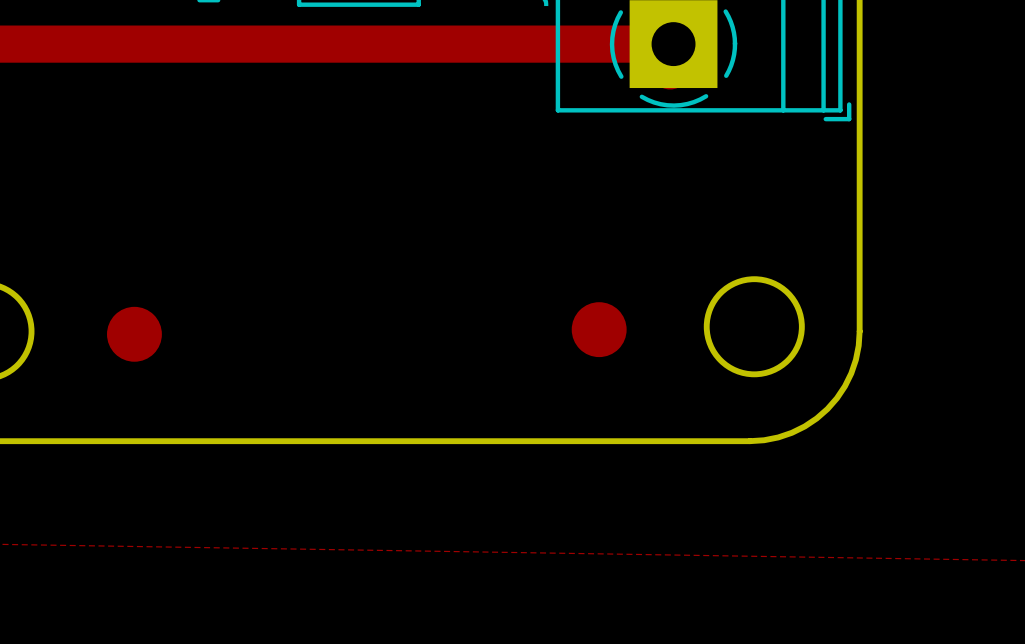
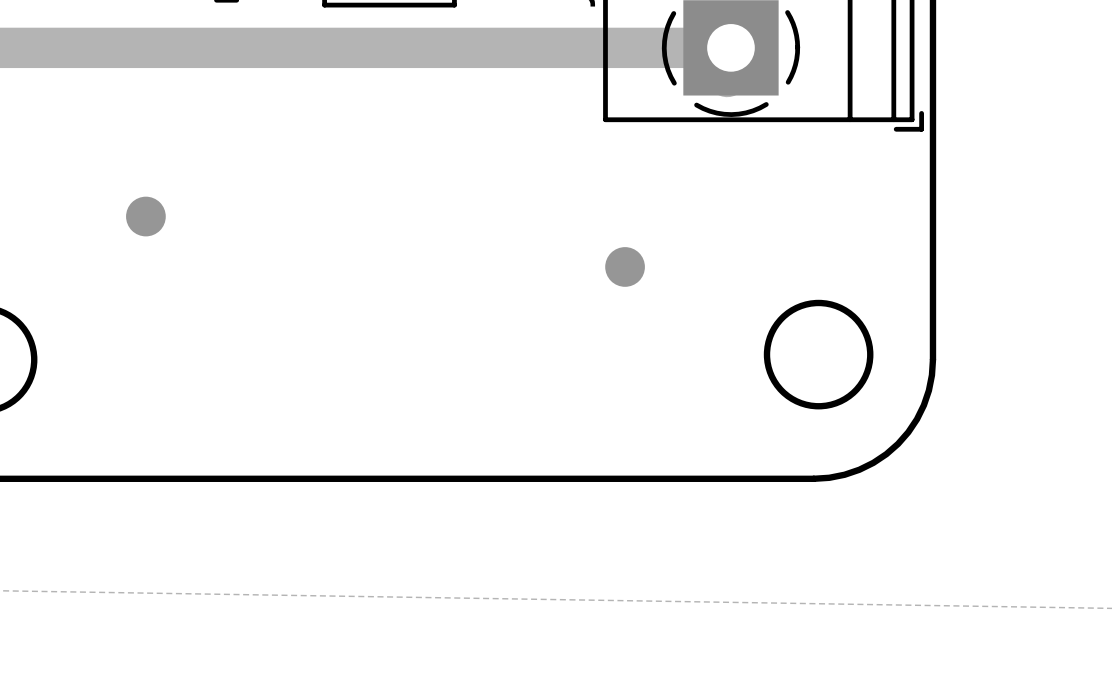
part: none -> (145, 216)
part: none -> (625, 266)
part: (599, 329) -> none
part: (134, 334) -> none

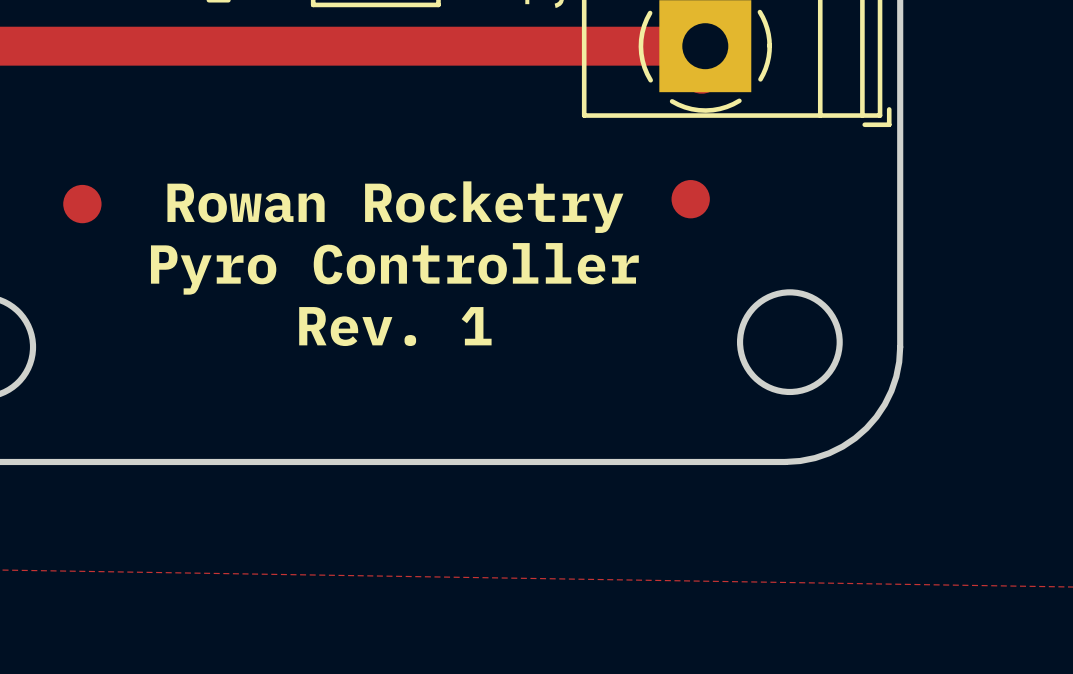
text: none -> Rowan Rocketry (395, 207)
part position: (145, 216) -> (82, 204)
part position: (625, 266) -> (690, 199)
text: none -> Pyro Controller (394, 268)
text: none -> Rev. 1 (395, 326)

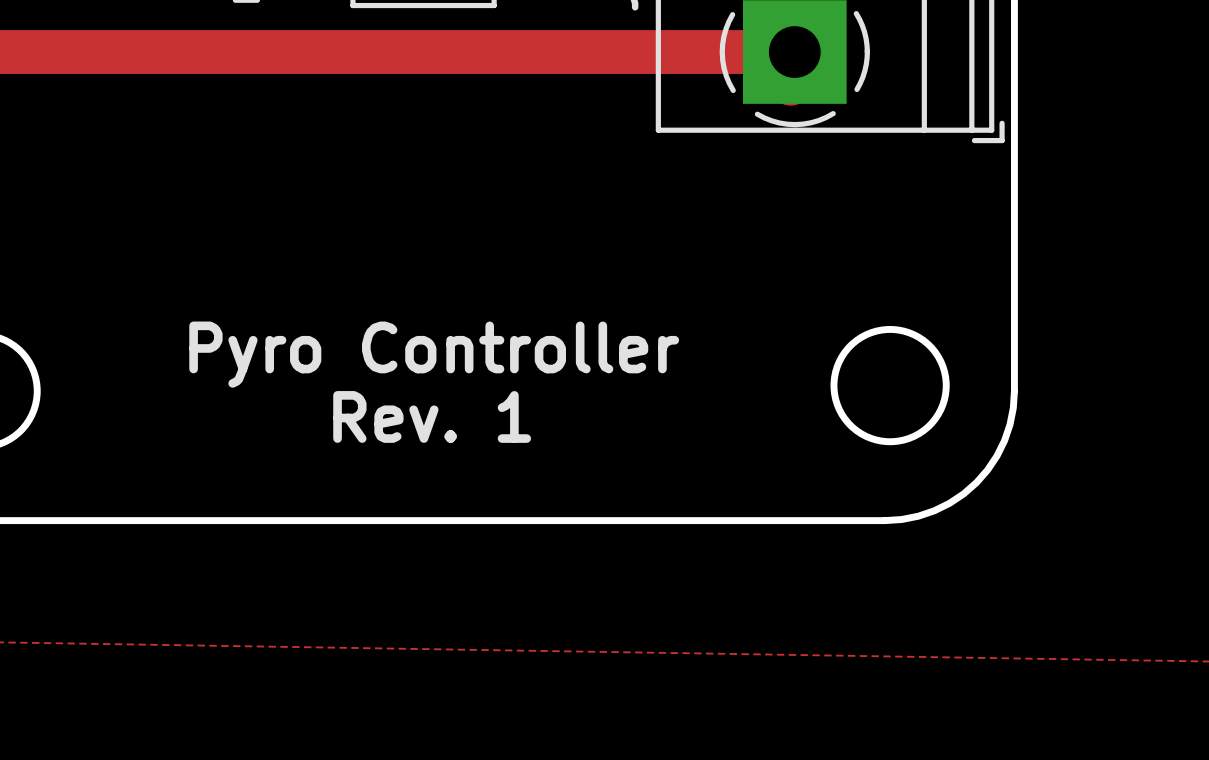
part: (690, 199) -> none
part: (82, 204) -> none
text: Rowan Rocketry (395, 207) -> none
text position: Pyro Controller (394, 268) -> Pyro Controller (434, 354)
text position: Rev. 1 (395, 326) -> Rev. 1 (432, 416)

